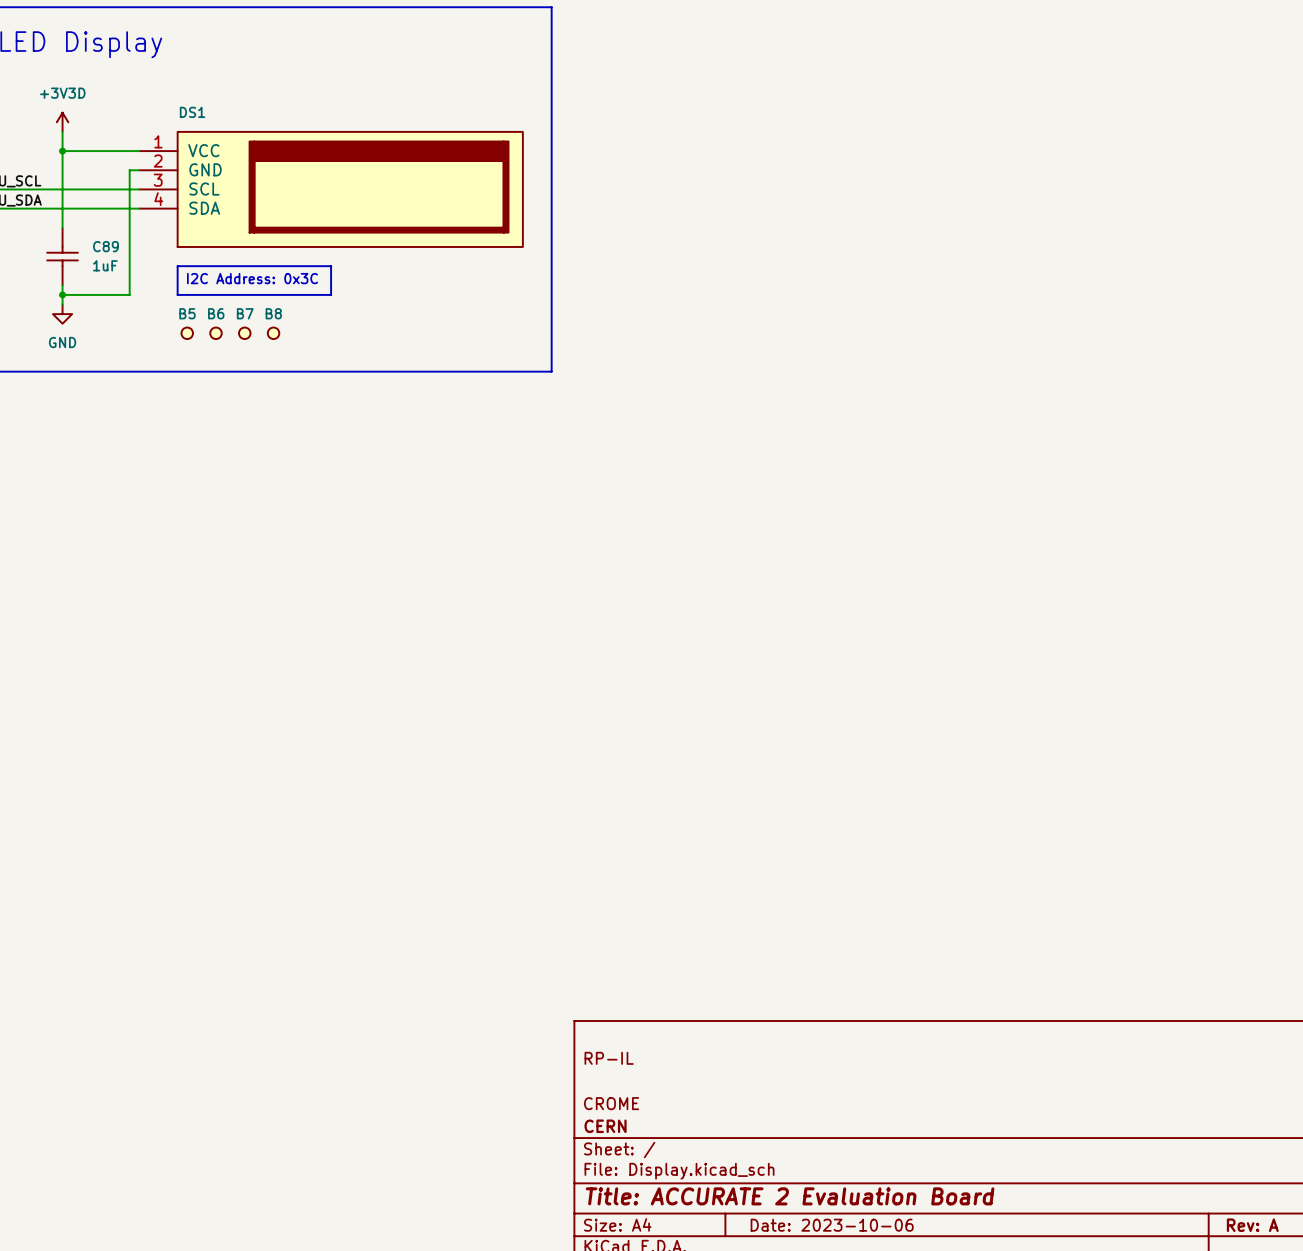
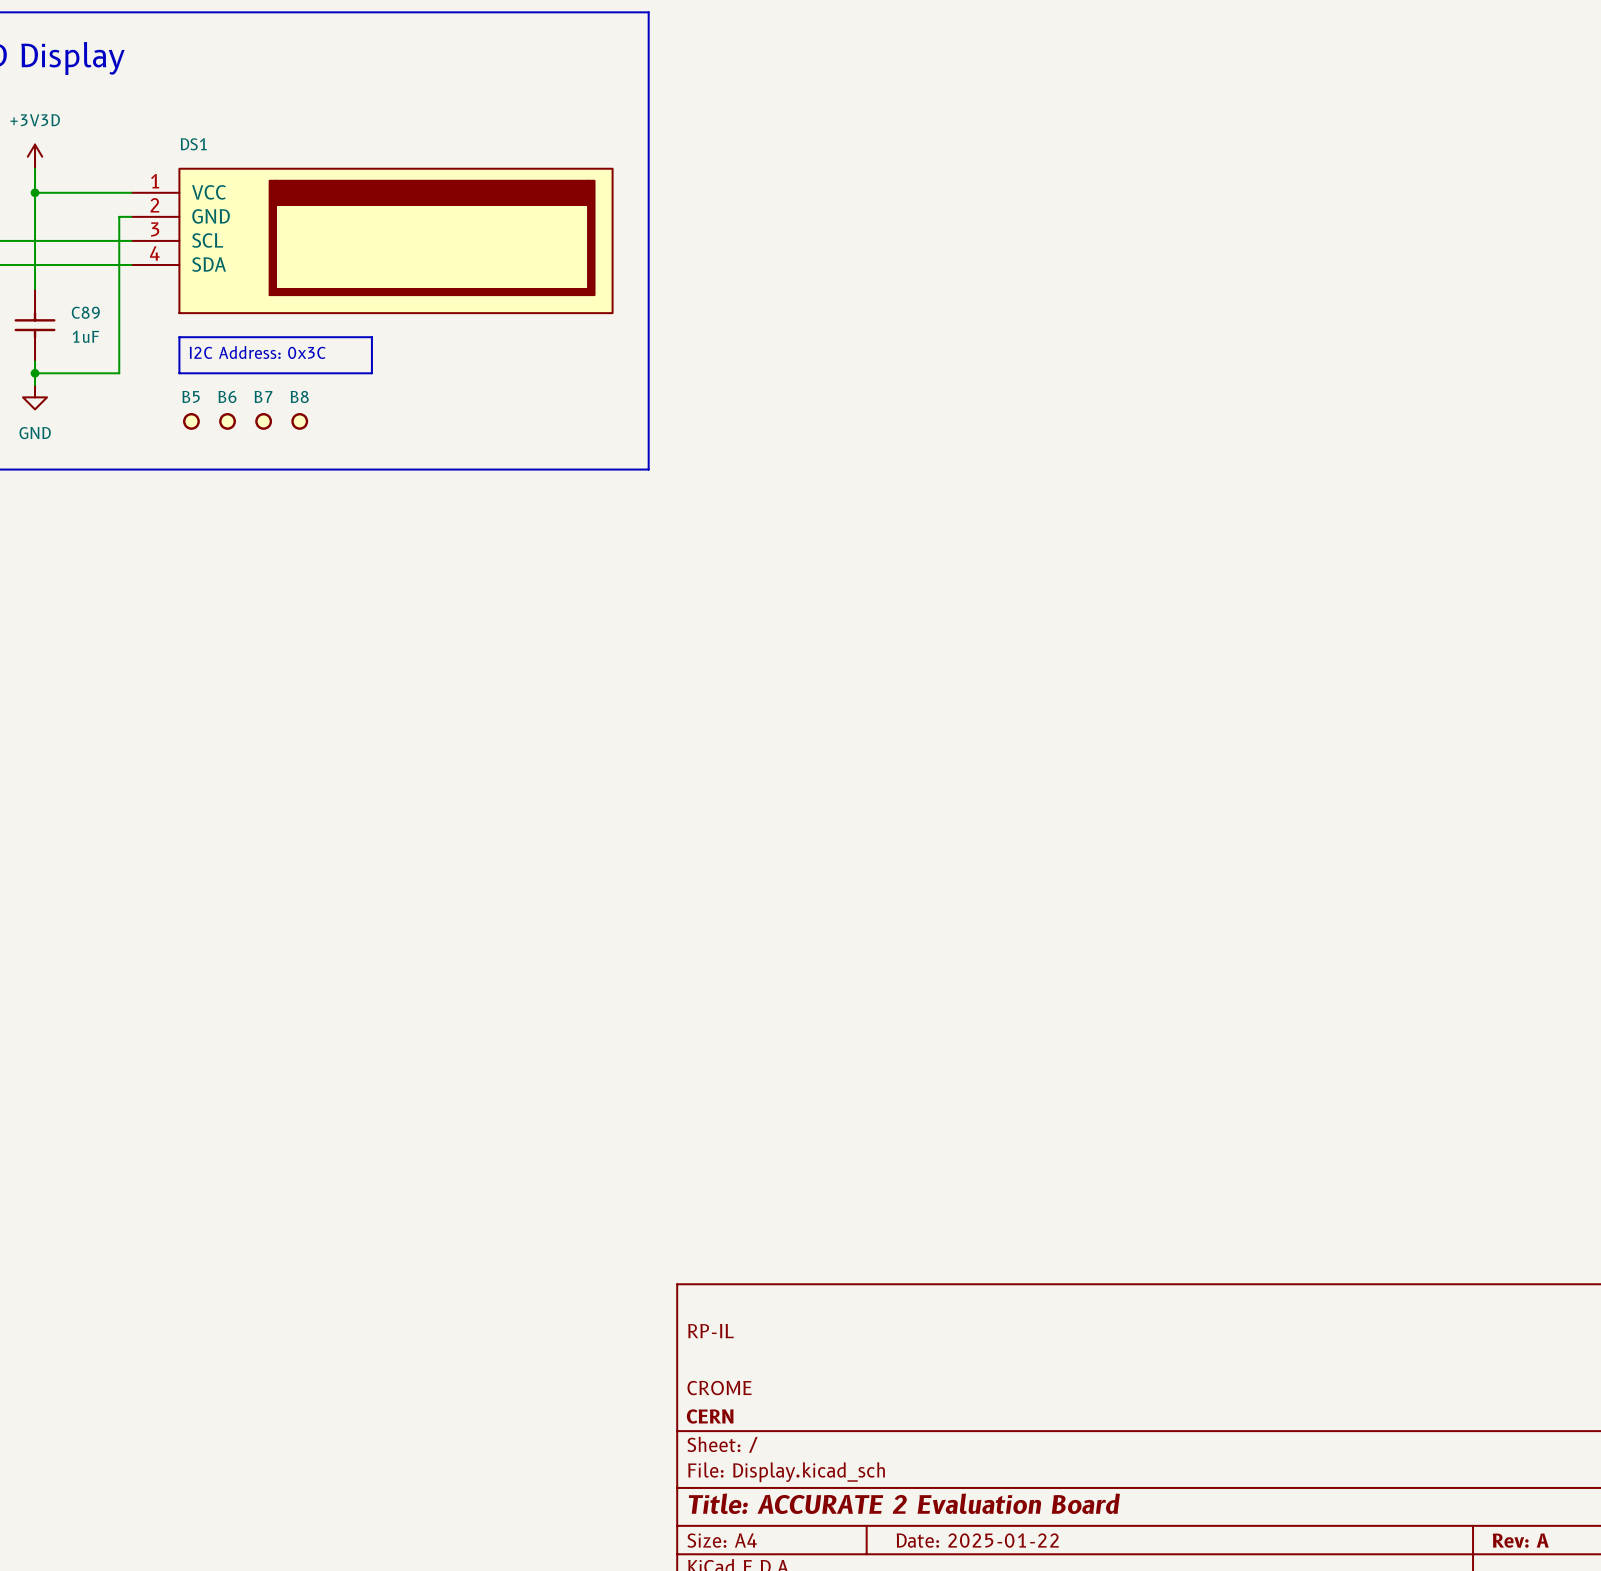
title block: Date: 2023-10-06 (832, 1225) -> Date: 2025-01-22 (977, 1540)

